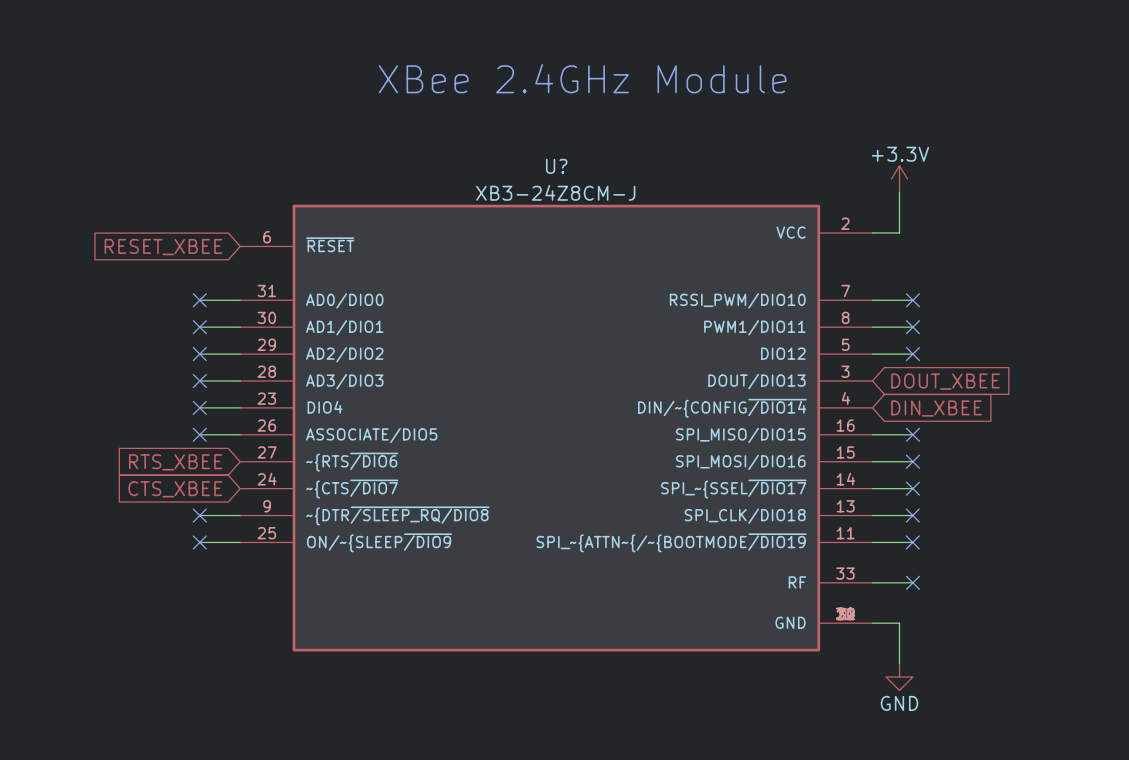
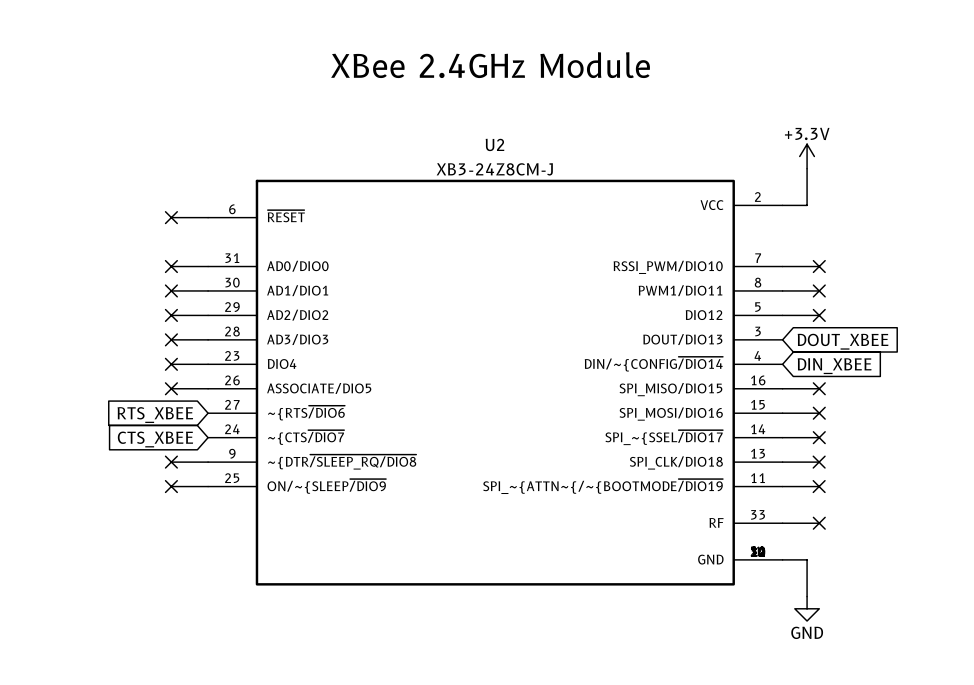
U? name: U? (556, 166) -> U2 (494, 144)
wire: none -> (171, 217) (208, 217)
no-connect mark: none -> (171, 217)
global label: RESET_XBEE (163, 247) -> none

